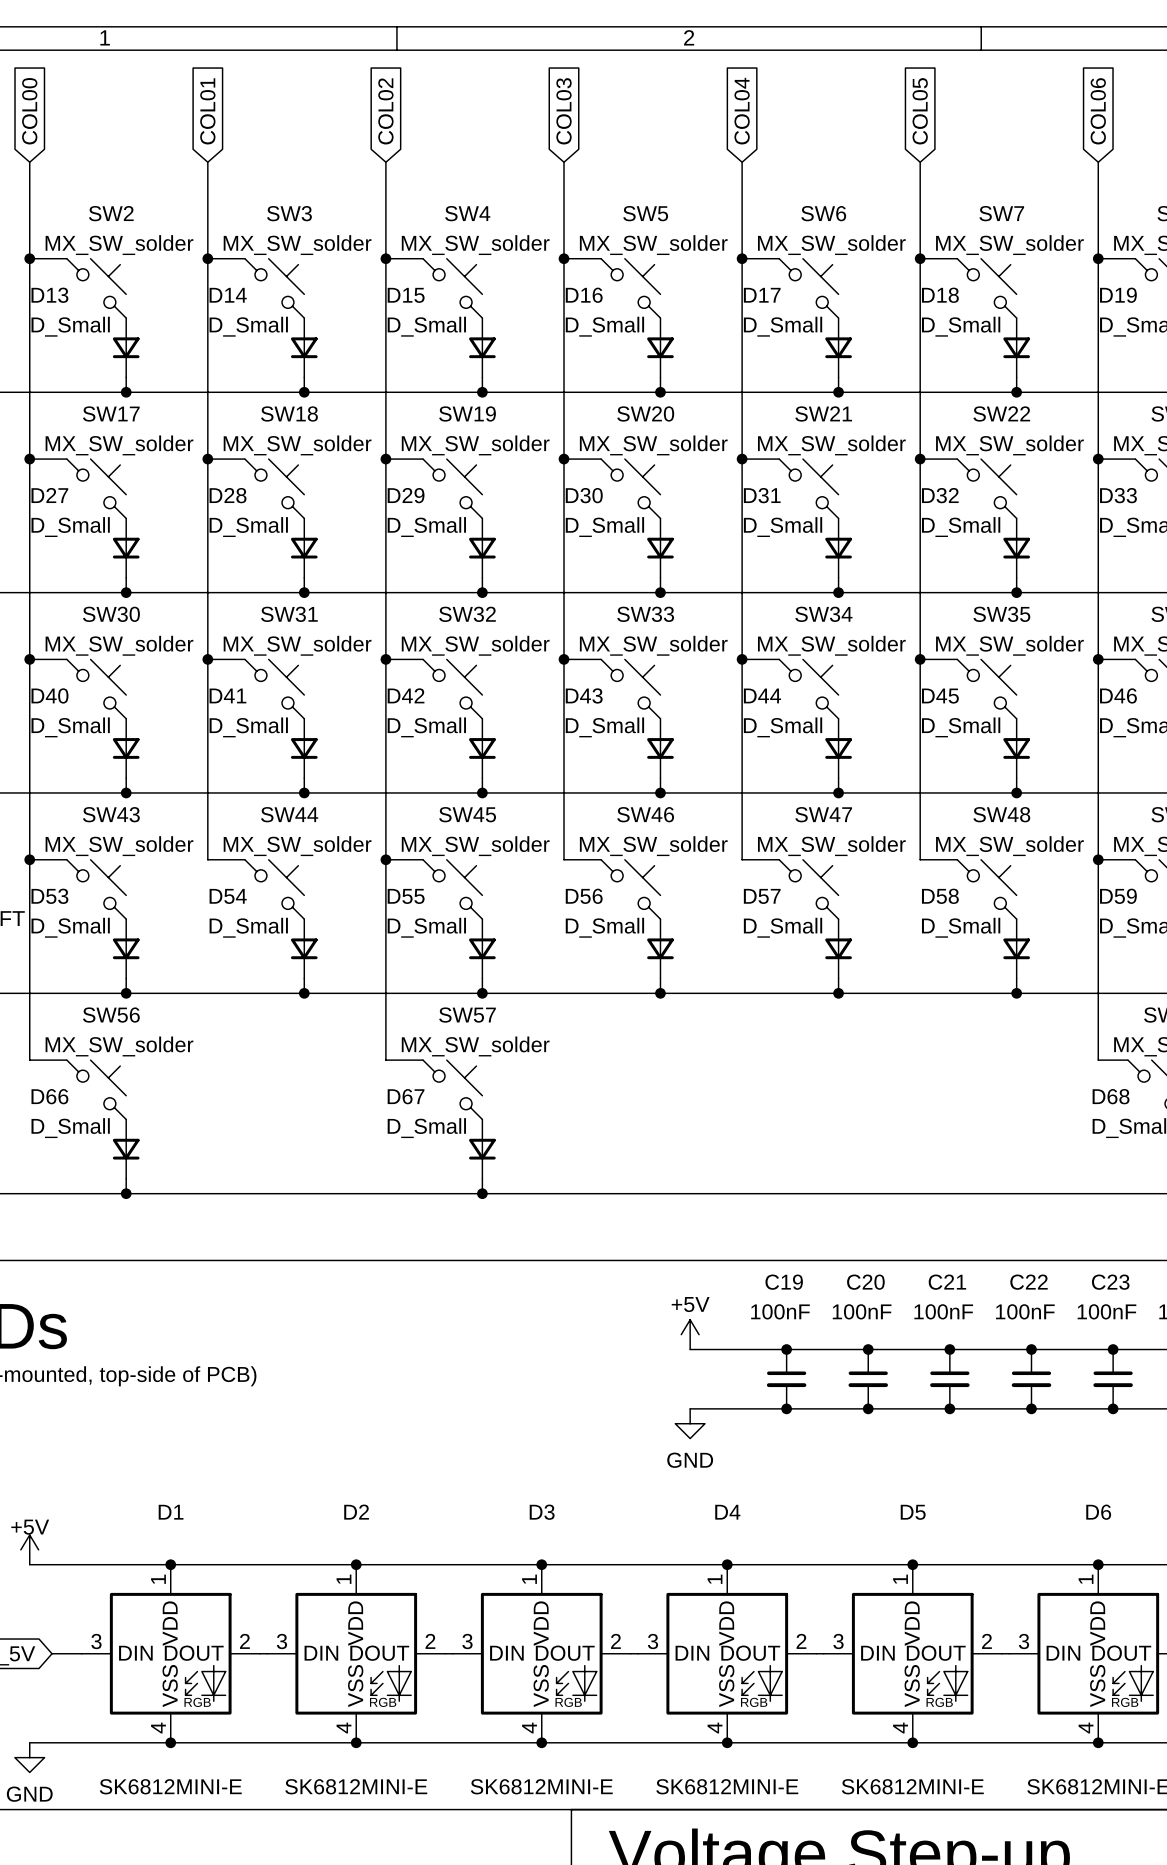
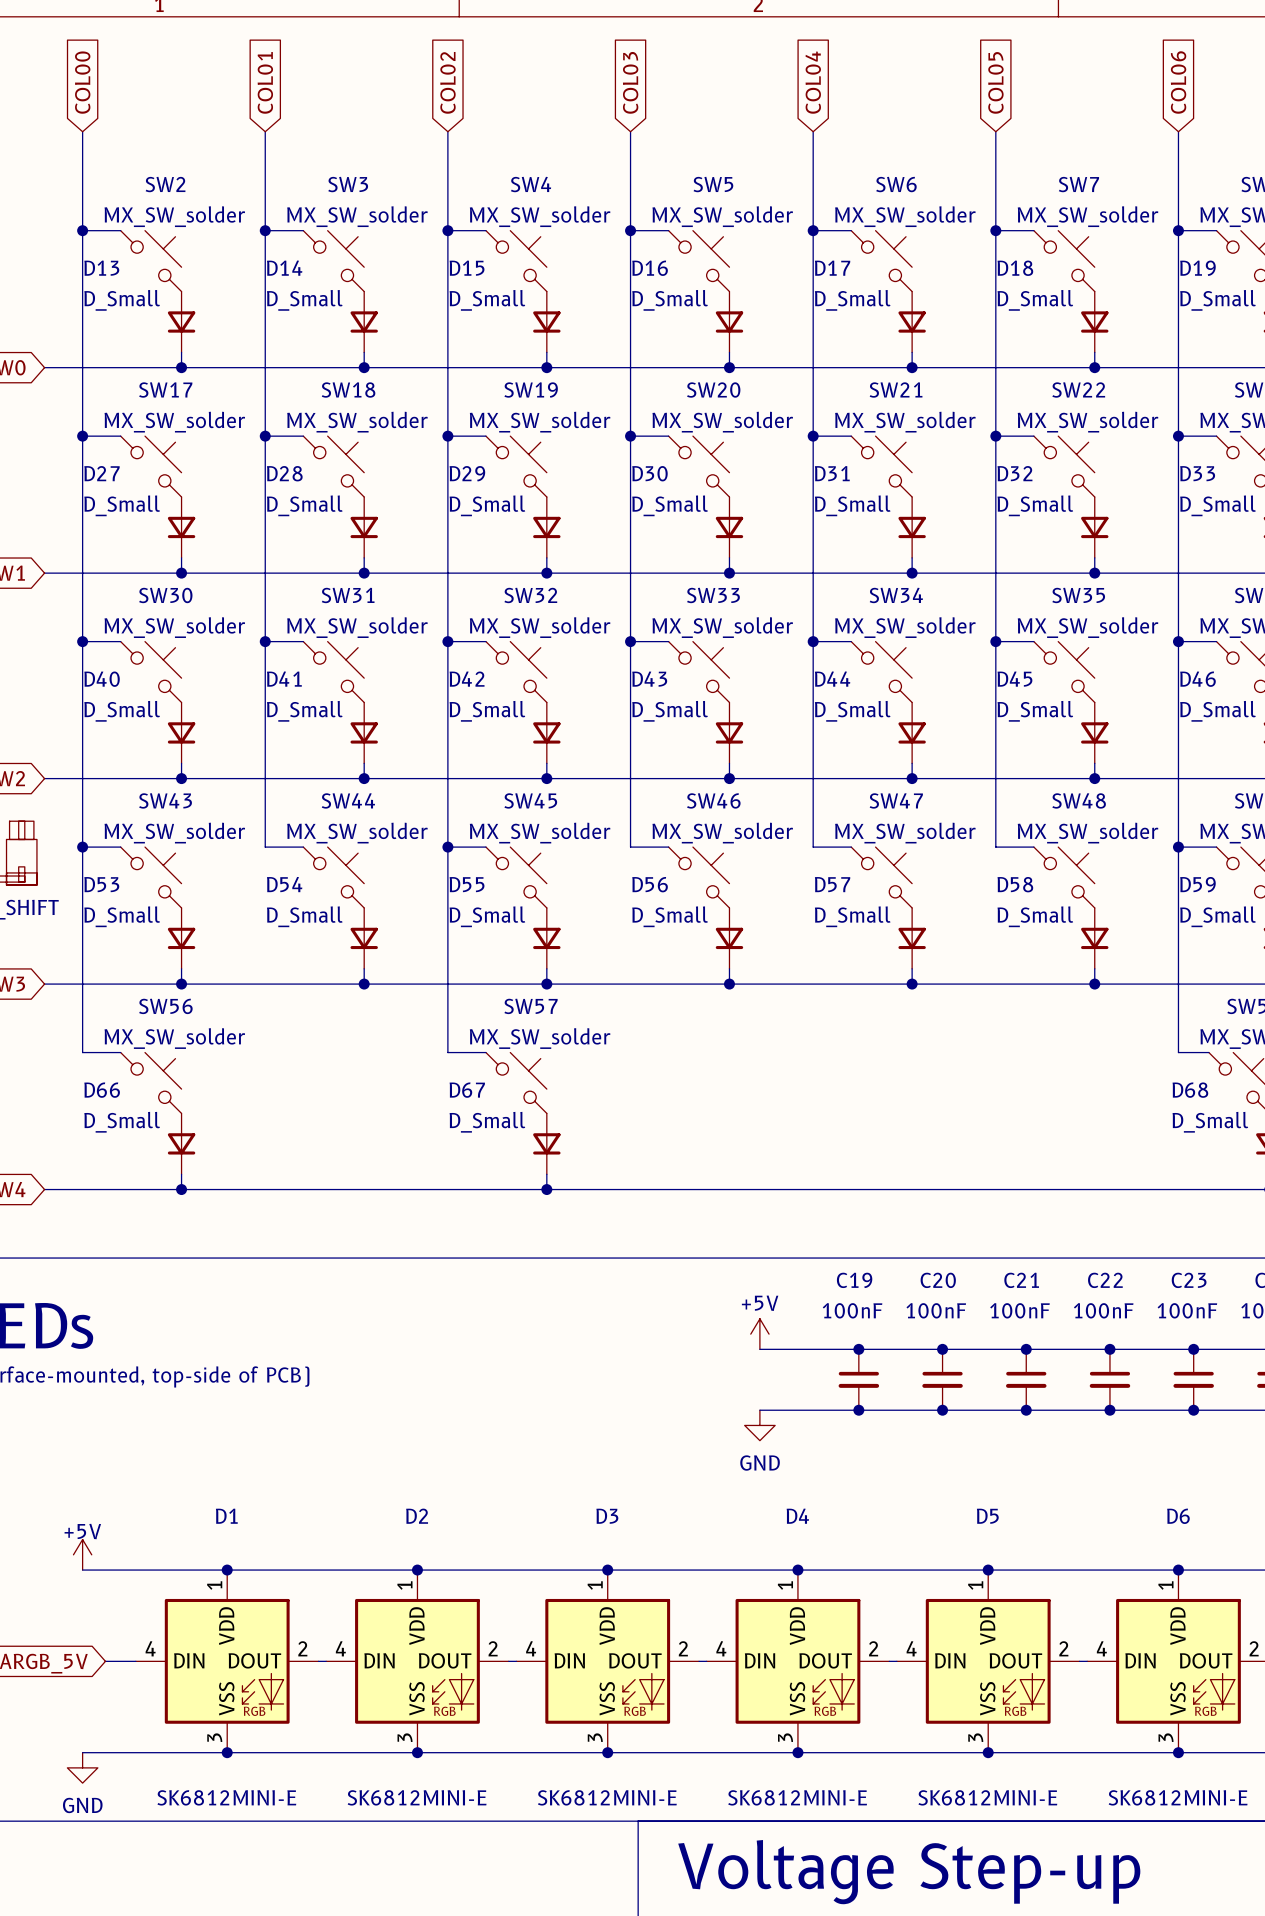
D1 pin number: 3 (96, 1641) -> 4 (150, 1648)
D2 pin number: 3 (281, 1641) -> 4 (340, 1648)
D3 pin number: 3 (467, 1641) -> 4 (531, 1648)
D4 pin number: 3 (652, 1641) -> 4 (721, 1648)
D5 pin number: 3 (838, 1641) -> 4 (911, 1648)
D6 pin number: 3 (1024, 1641) -> 4 (1101, 1648)
D1 pin number: 4 (158, 1728) -> 3 (214, 1737)
D2 pin number: 4 (343, 1728) -> 3 (405, 1737)
D3 pin number: 4 (529, 1728) -> 3 (595, 1737)
D4 pin number: 4 (715, 1728) -> 3 (785, 1737)
D5 pin number: 4 (900, 1728) -> 3 (975, 1737)
D6 pin number: 4 (1086, 1728) -> 3 (1166, 1737)

